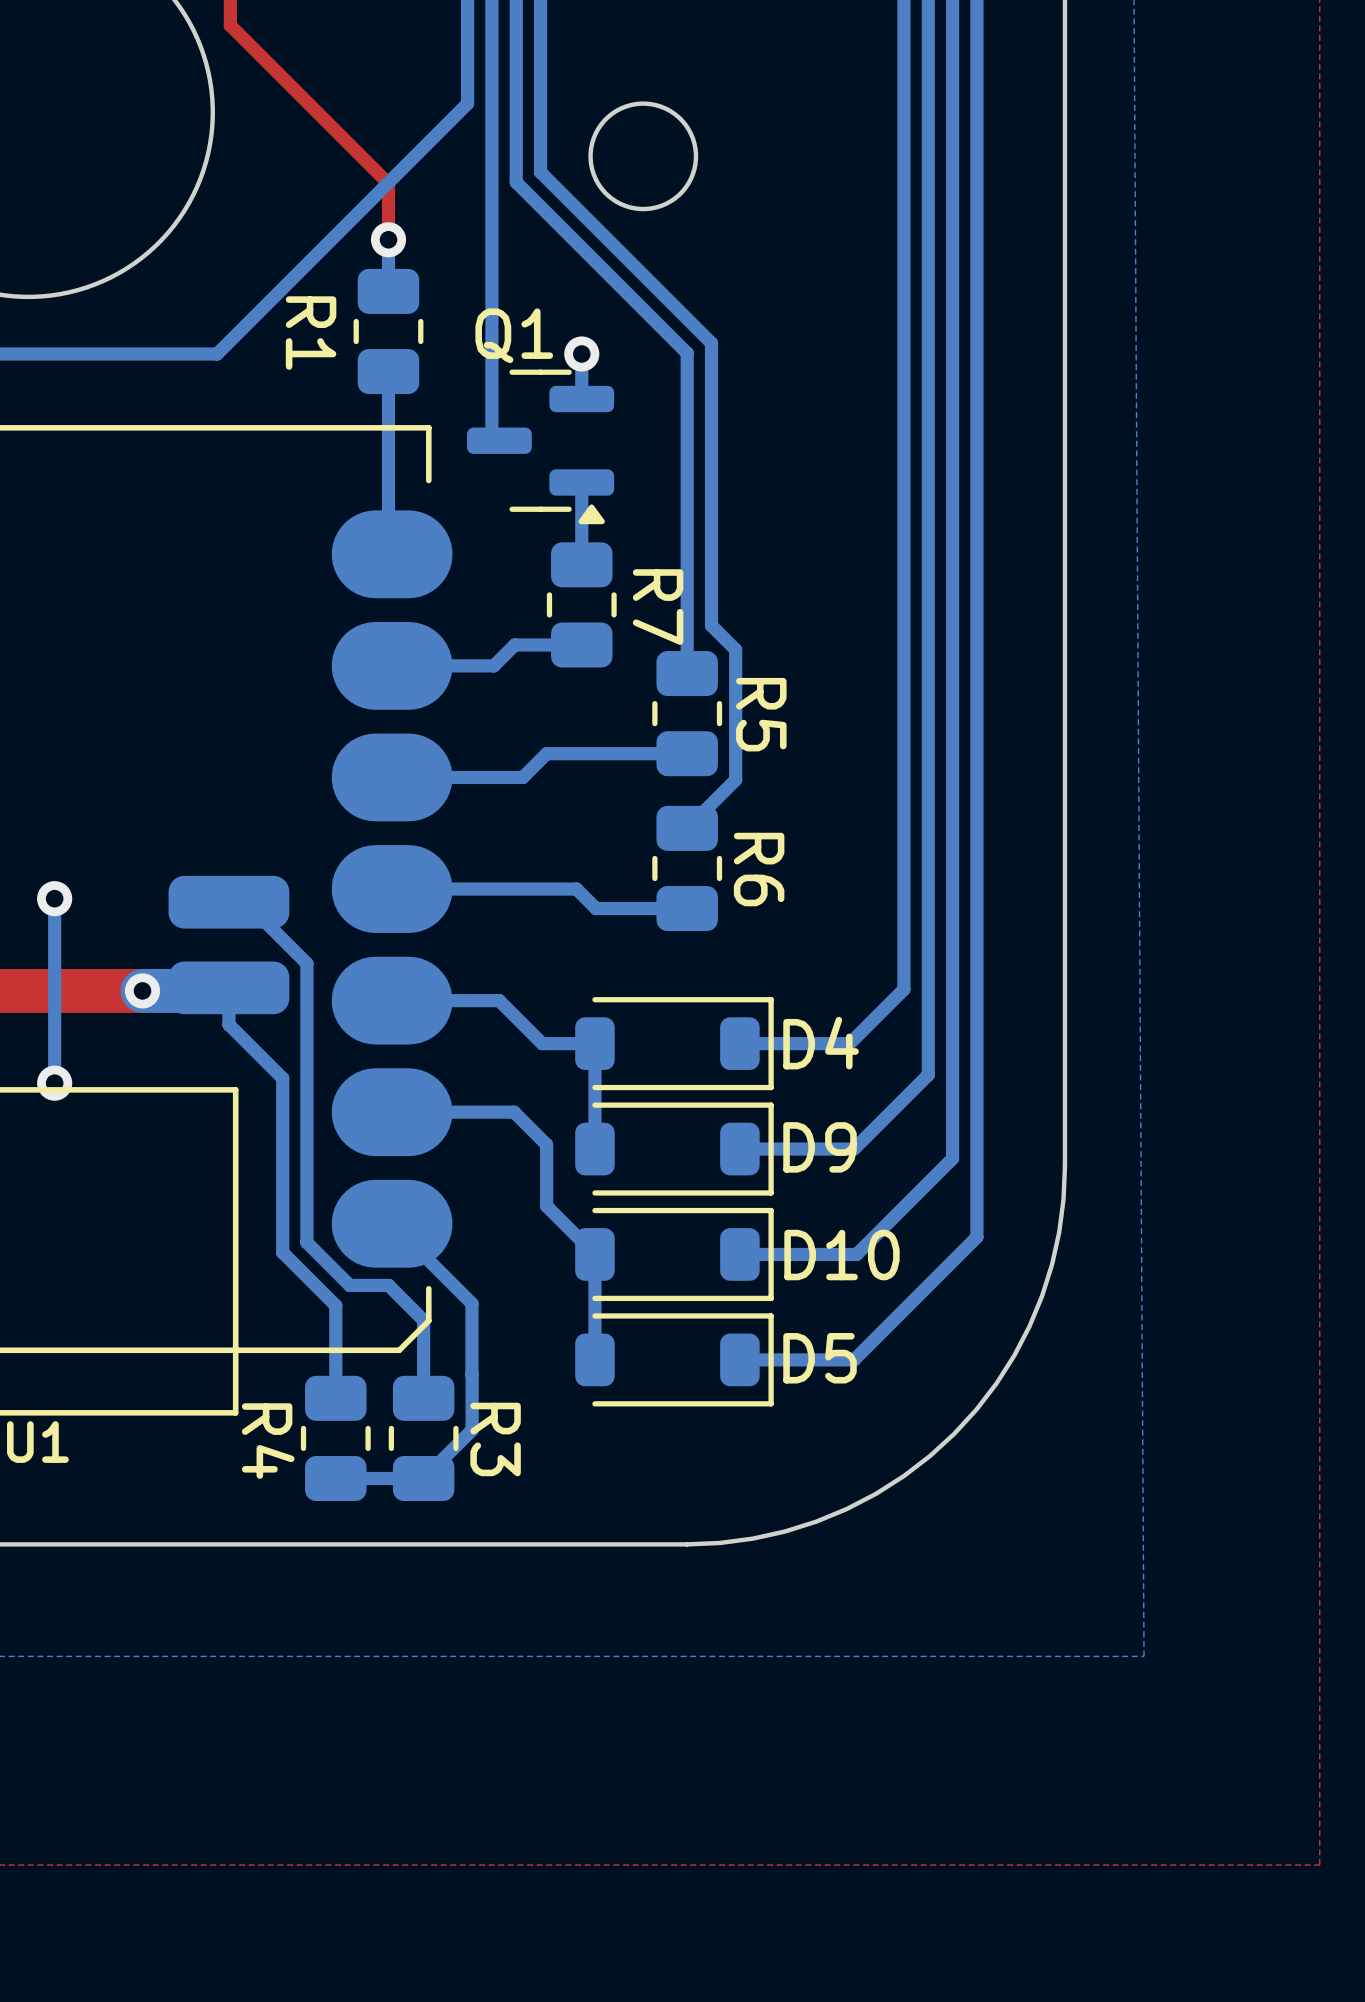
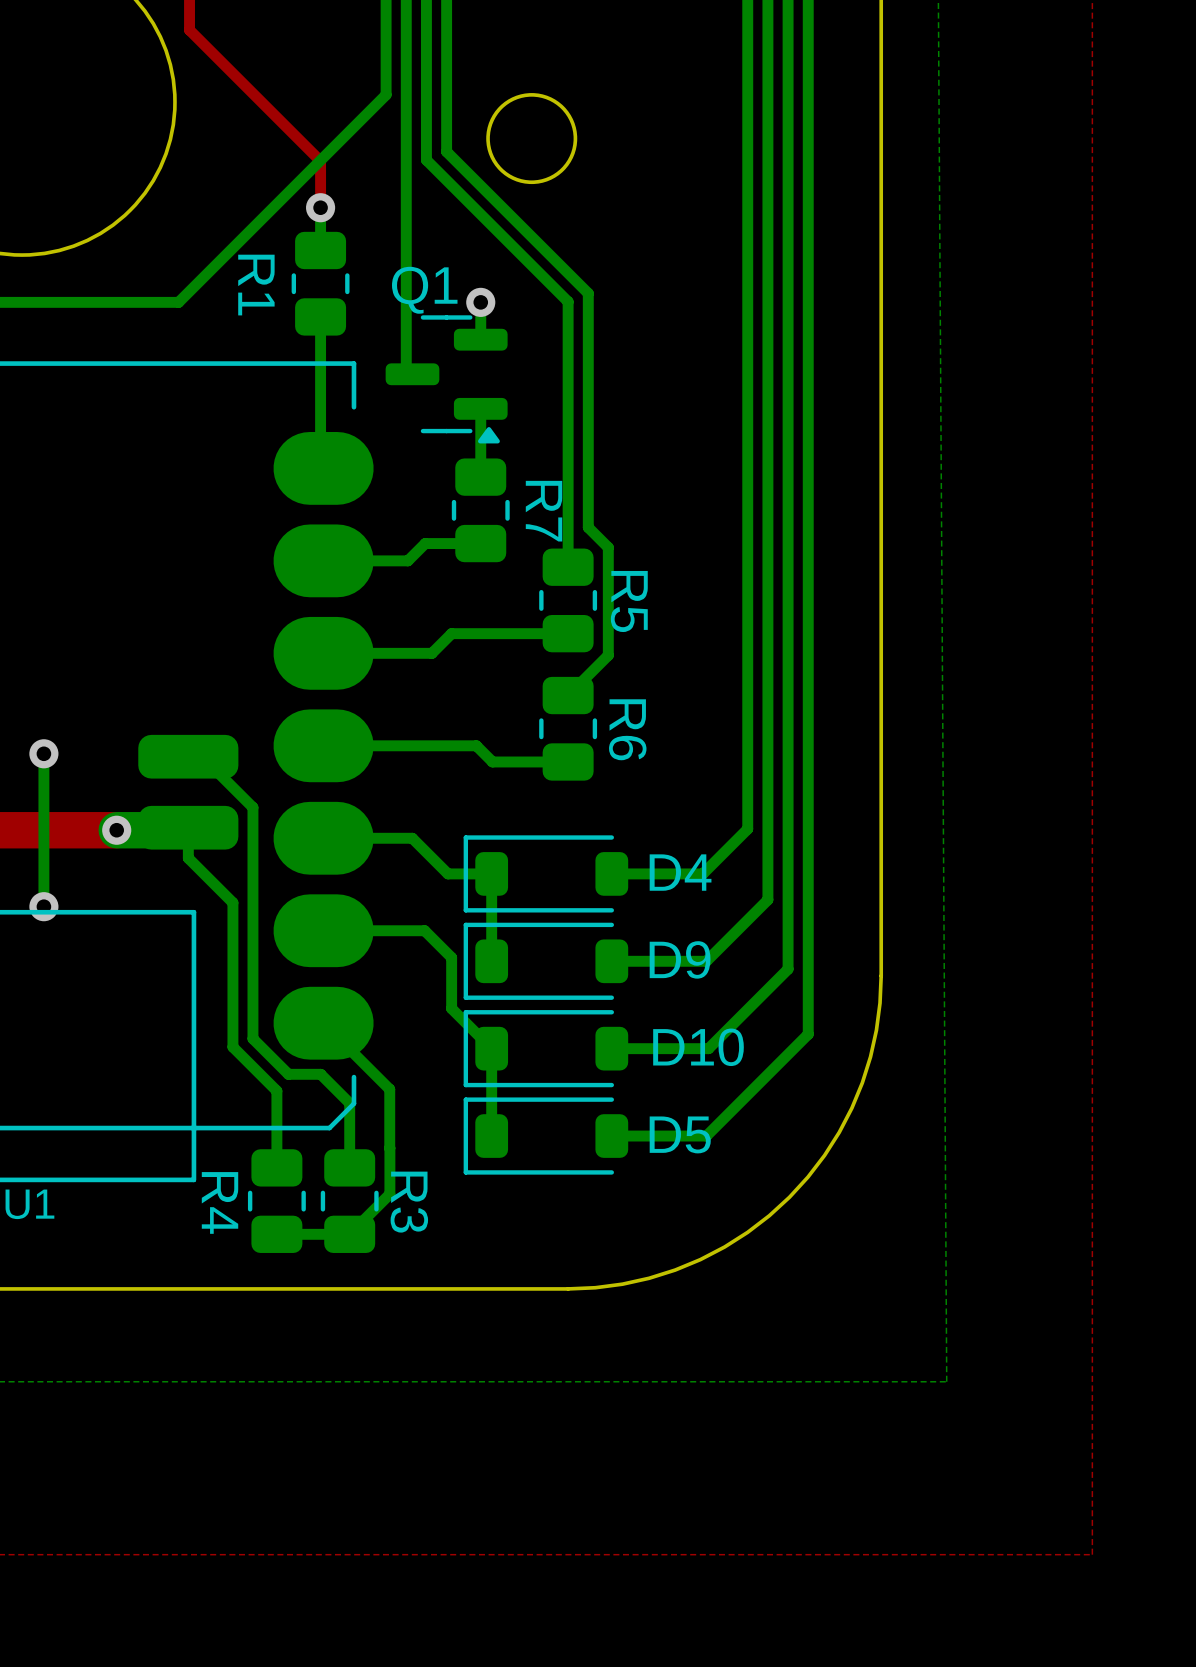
D4 rotation: 0° (674, 1043) -> 180° (545, 873)
D9 rotation: 0° (674, 1149) -> 180° (545, 961)
D10 rotation: 0° (674, 1254) -> 180° (545, 1048)
D5 rotation: 0° (674, 1359) -> 180° (545, 1136)

